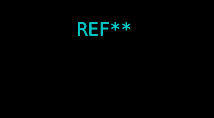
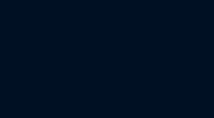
REF**: (104, 28) -> none

